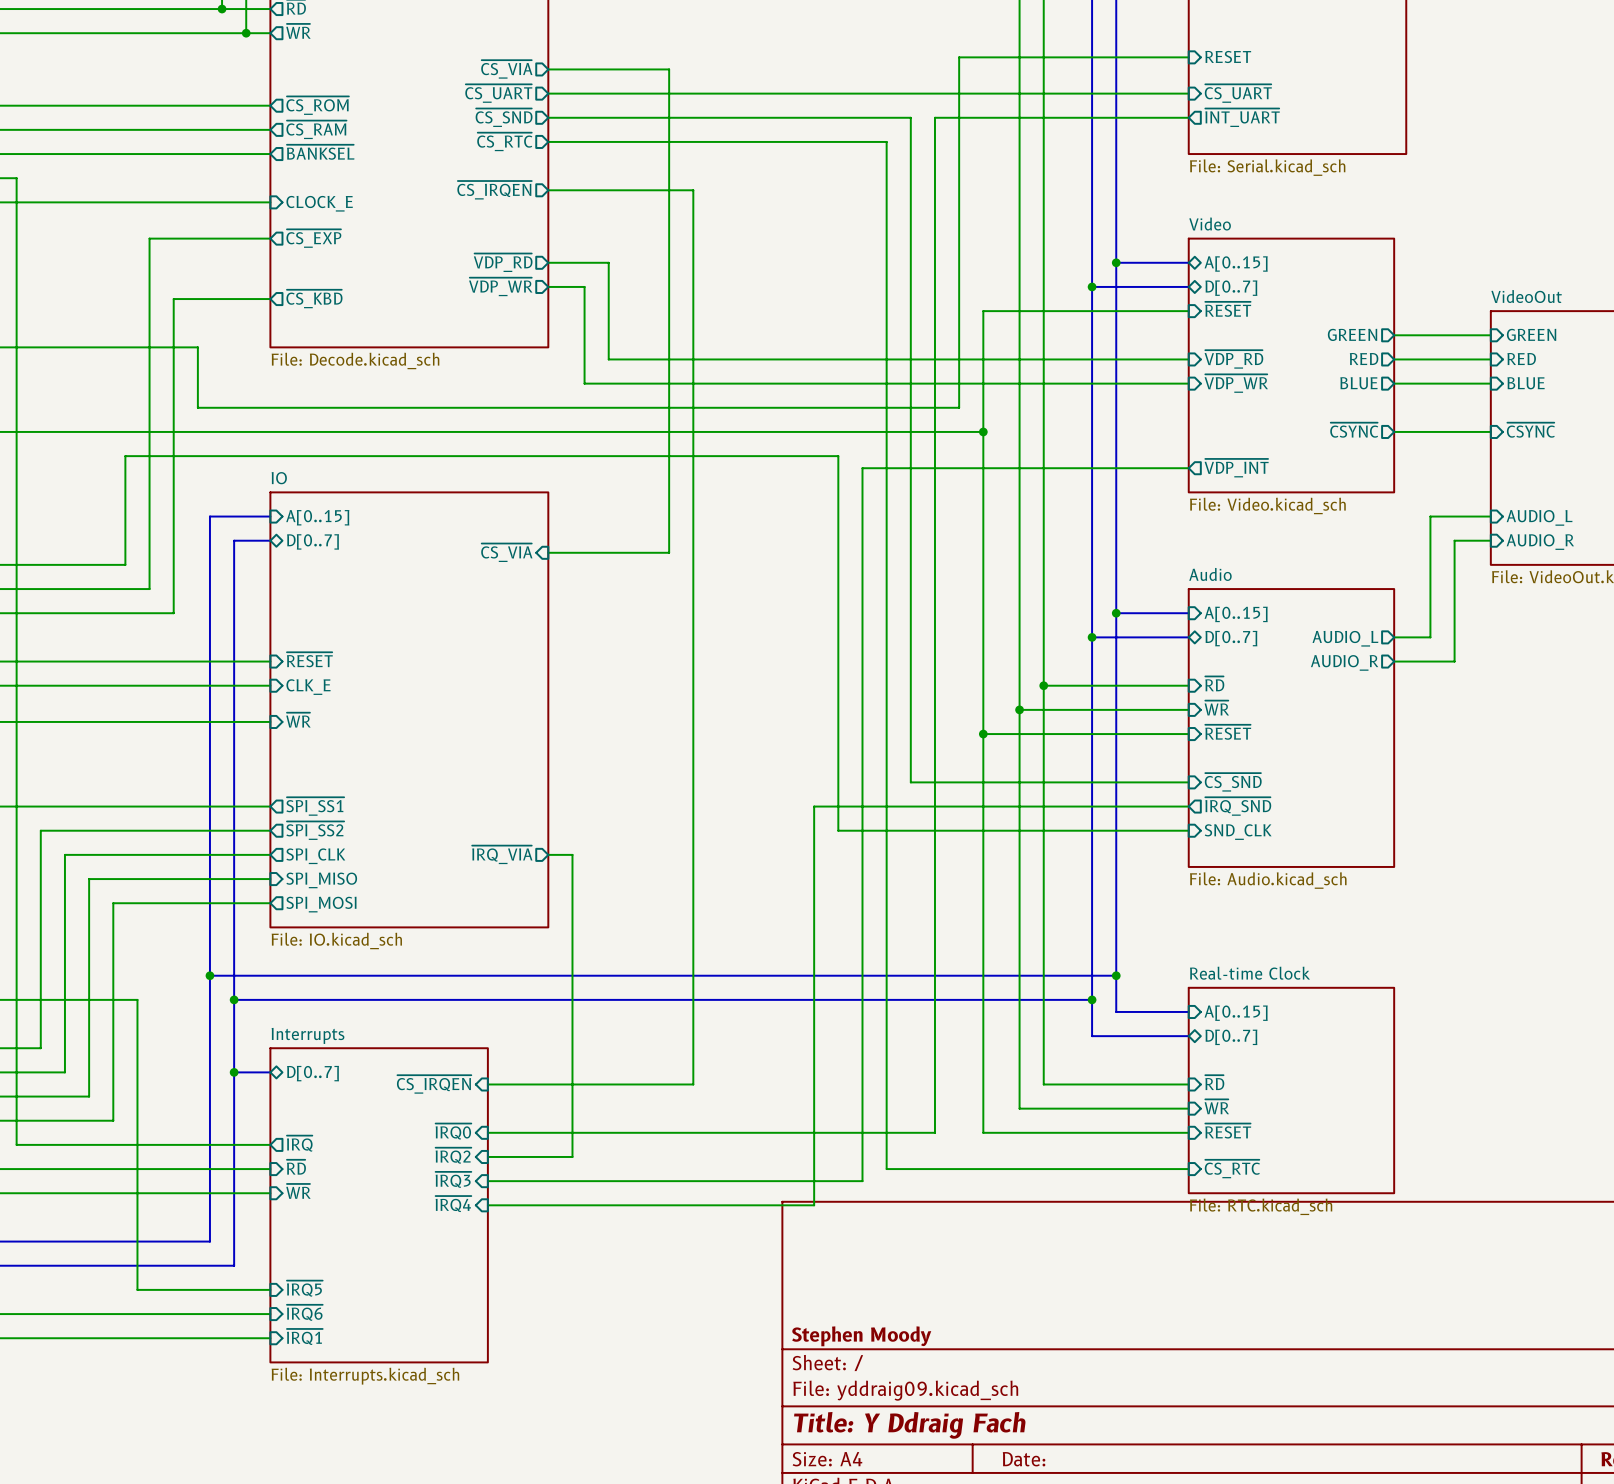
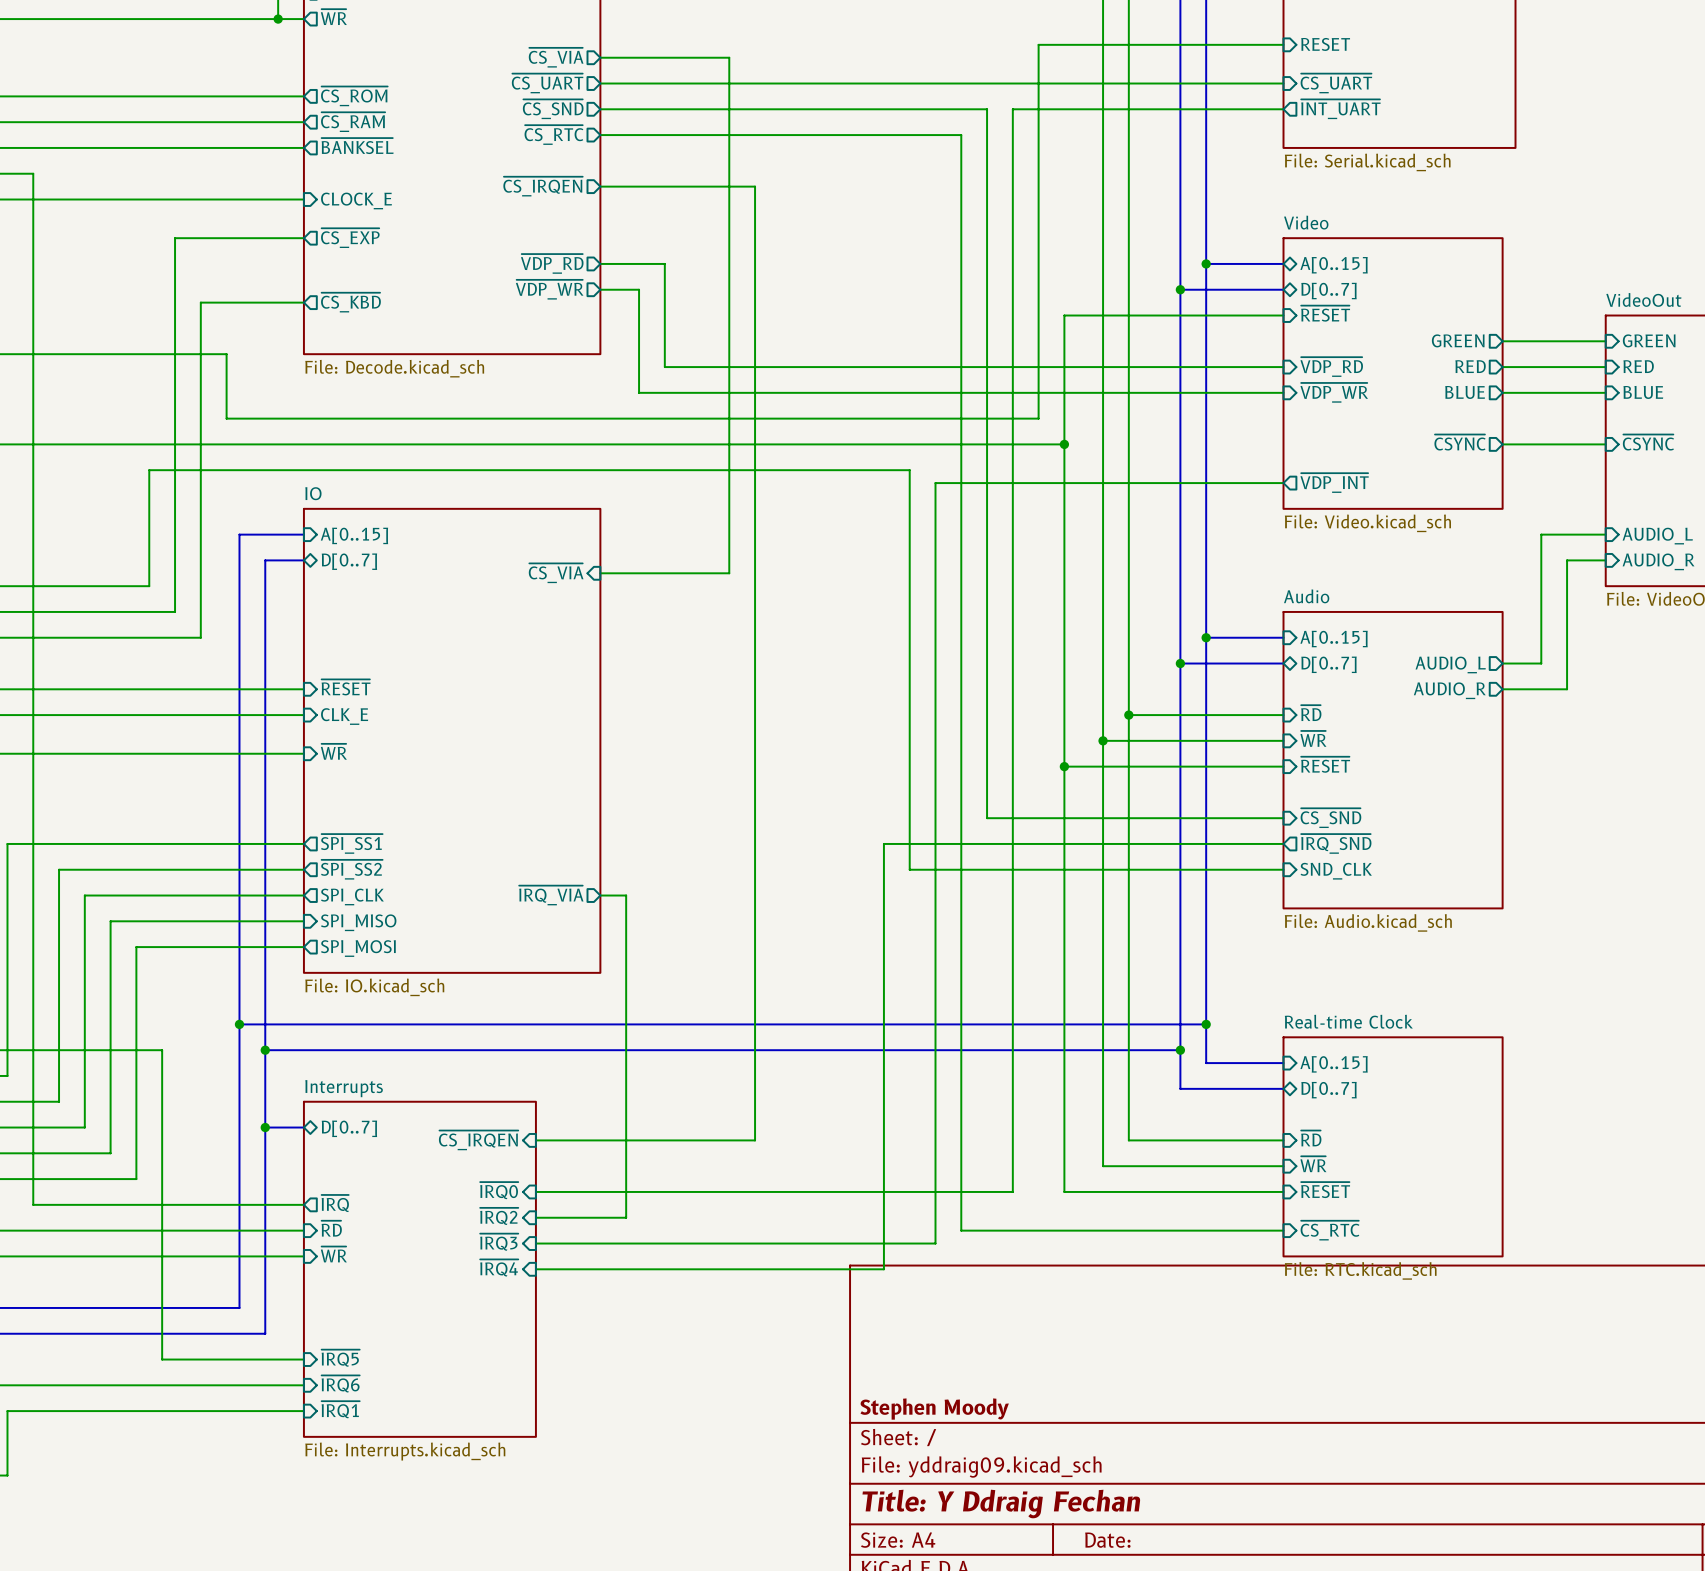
title block: Title: Y Ddraig Fach (909, 1425) -> Title: Y Ddraig Fechan (1001, 1504)

